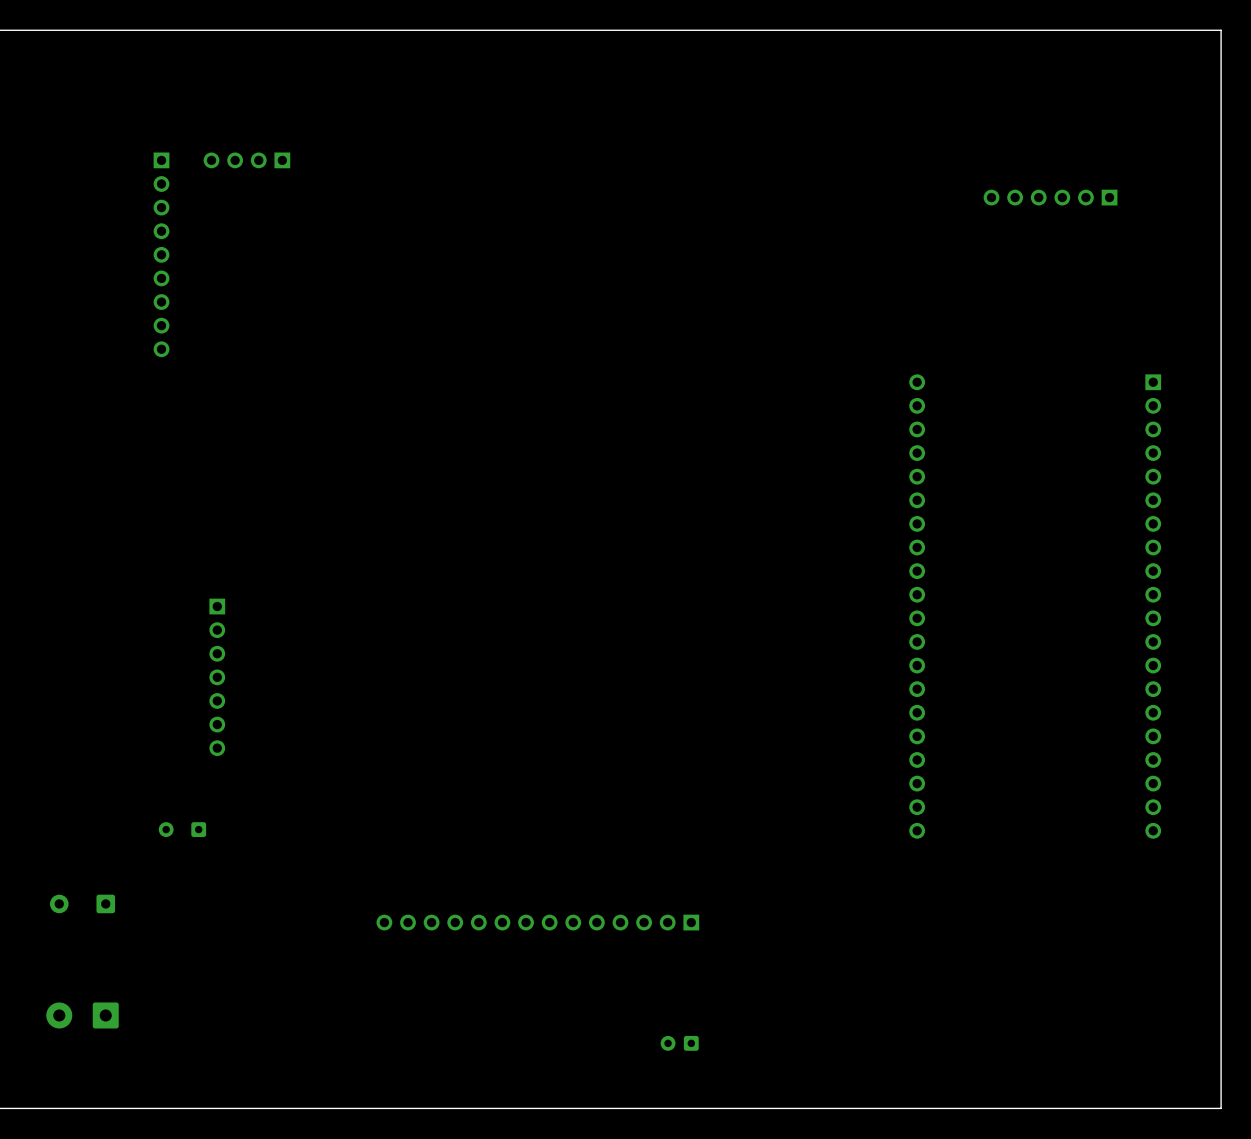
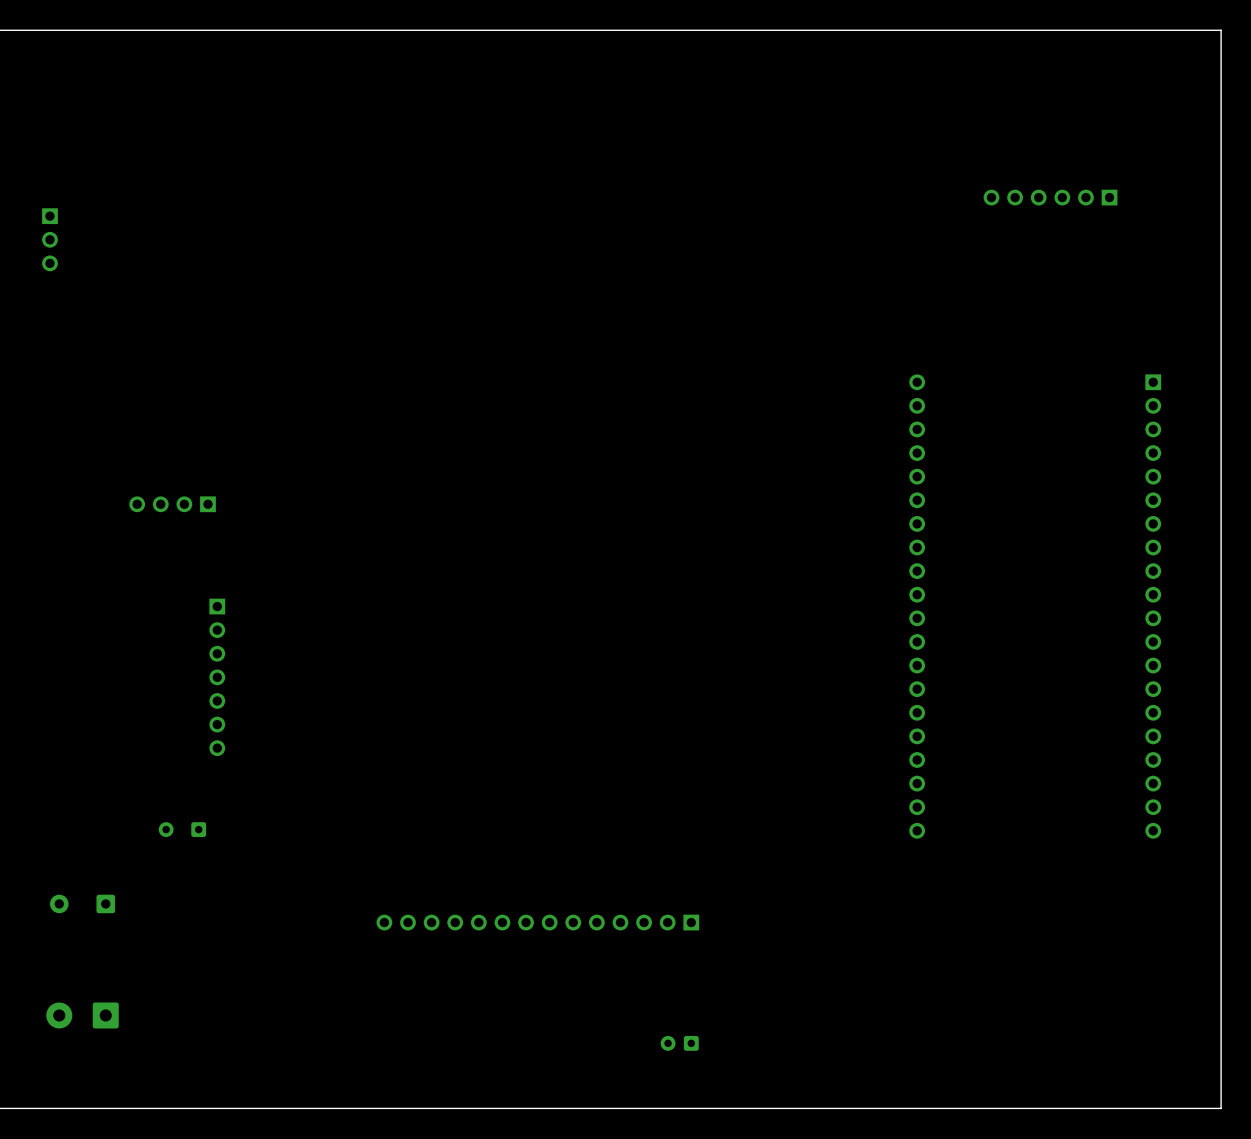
part: (246, 160) -> none
part: none -> (49, 239)
part: (161, 254) -> none
part: none -> (172, 504)

